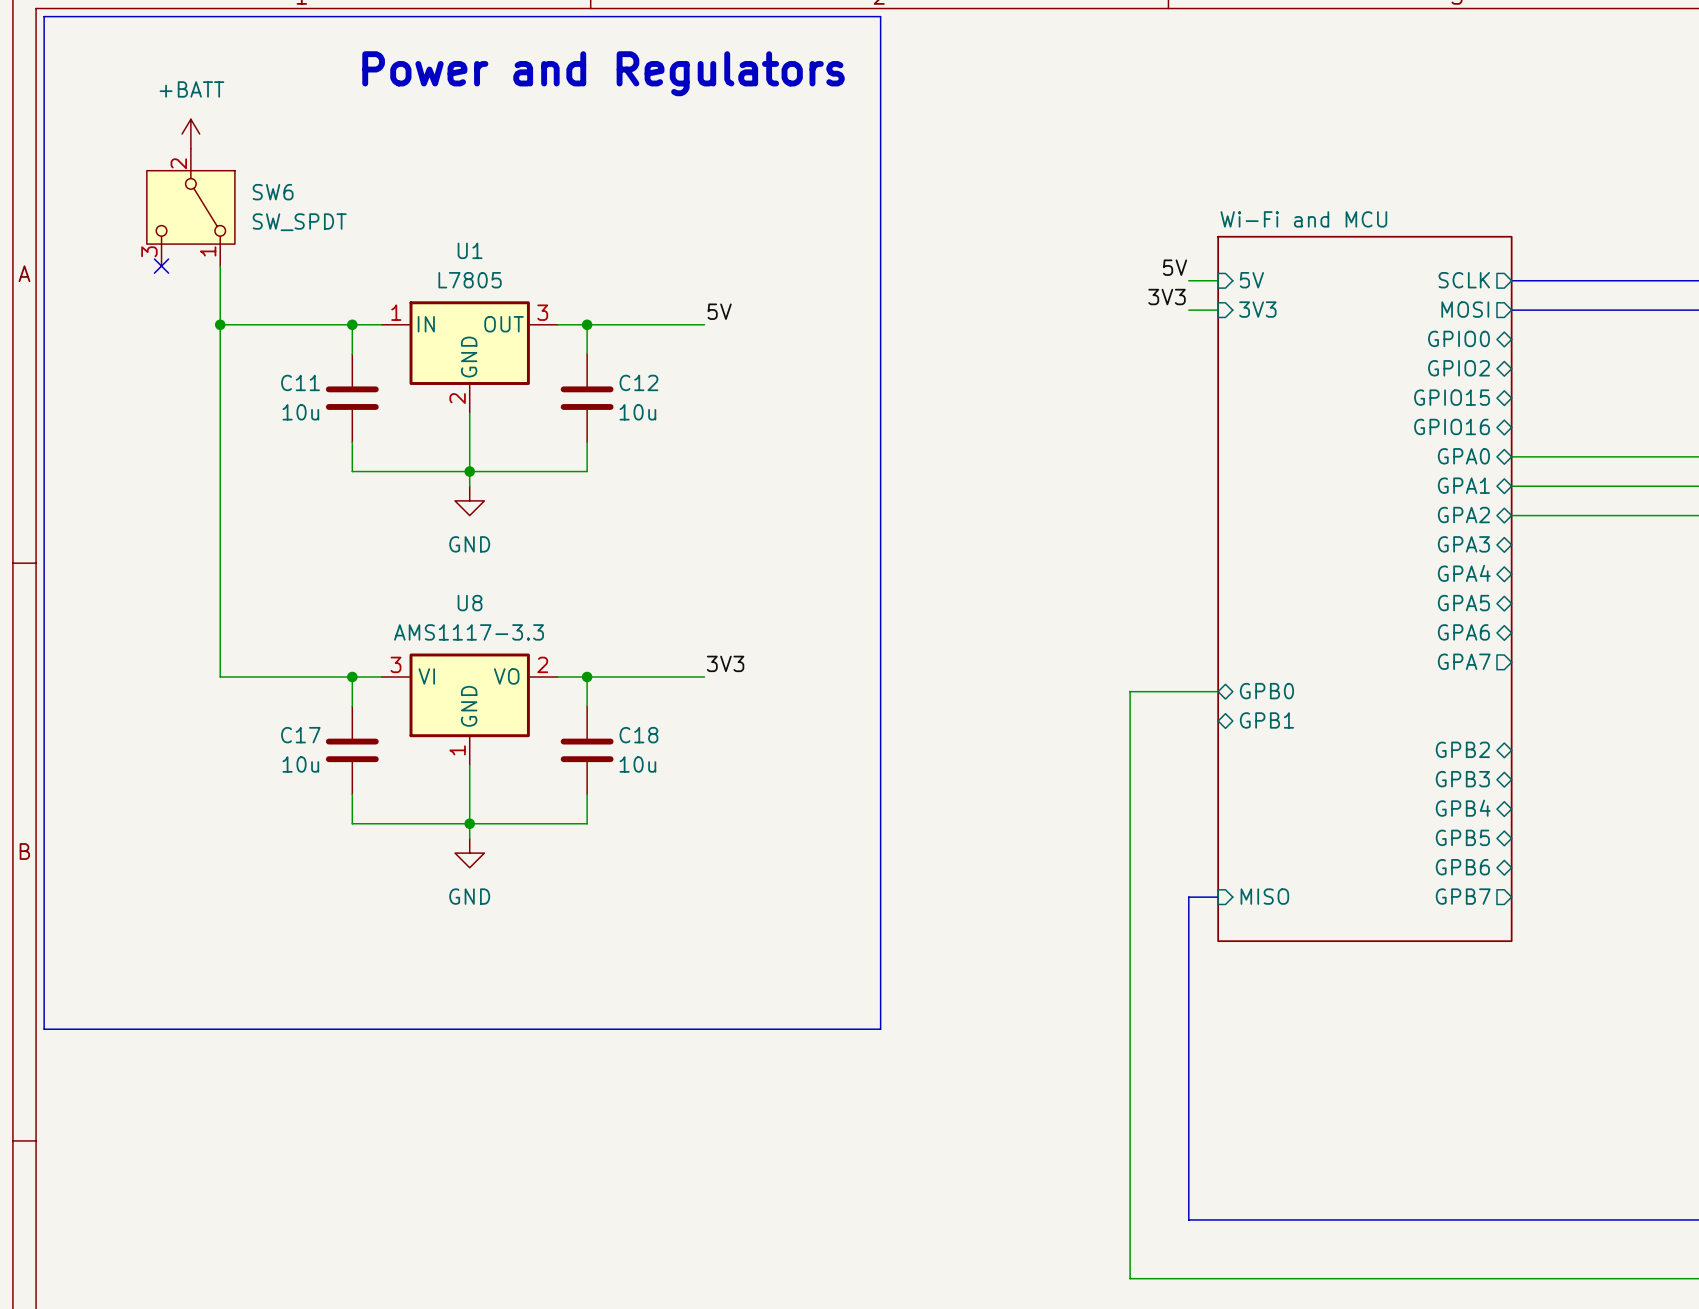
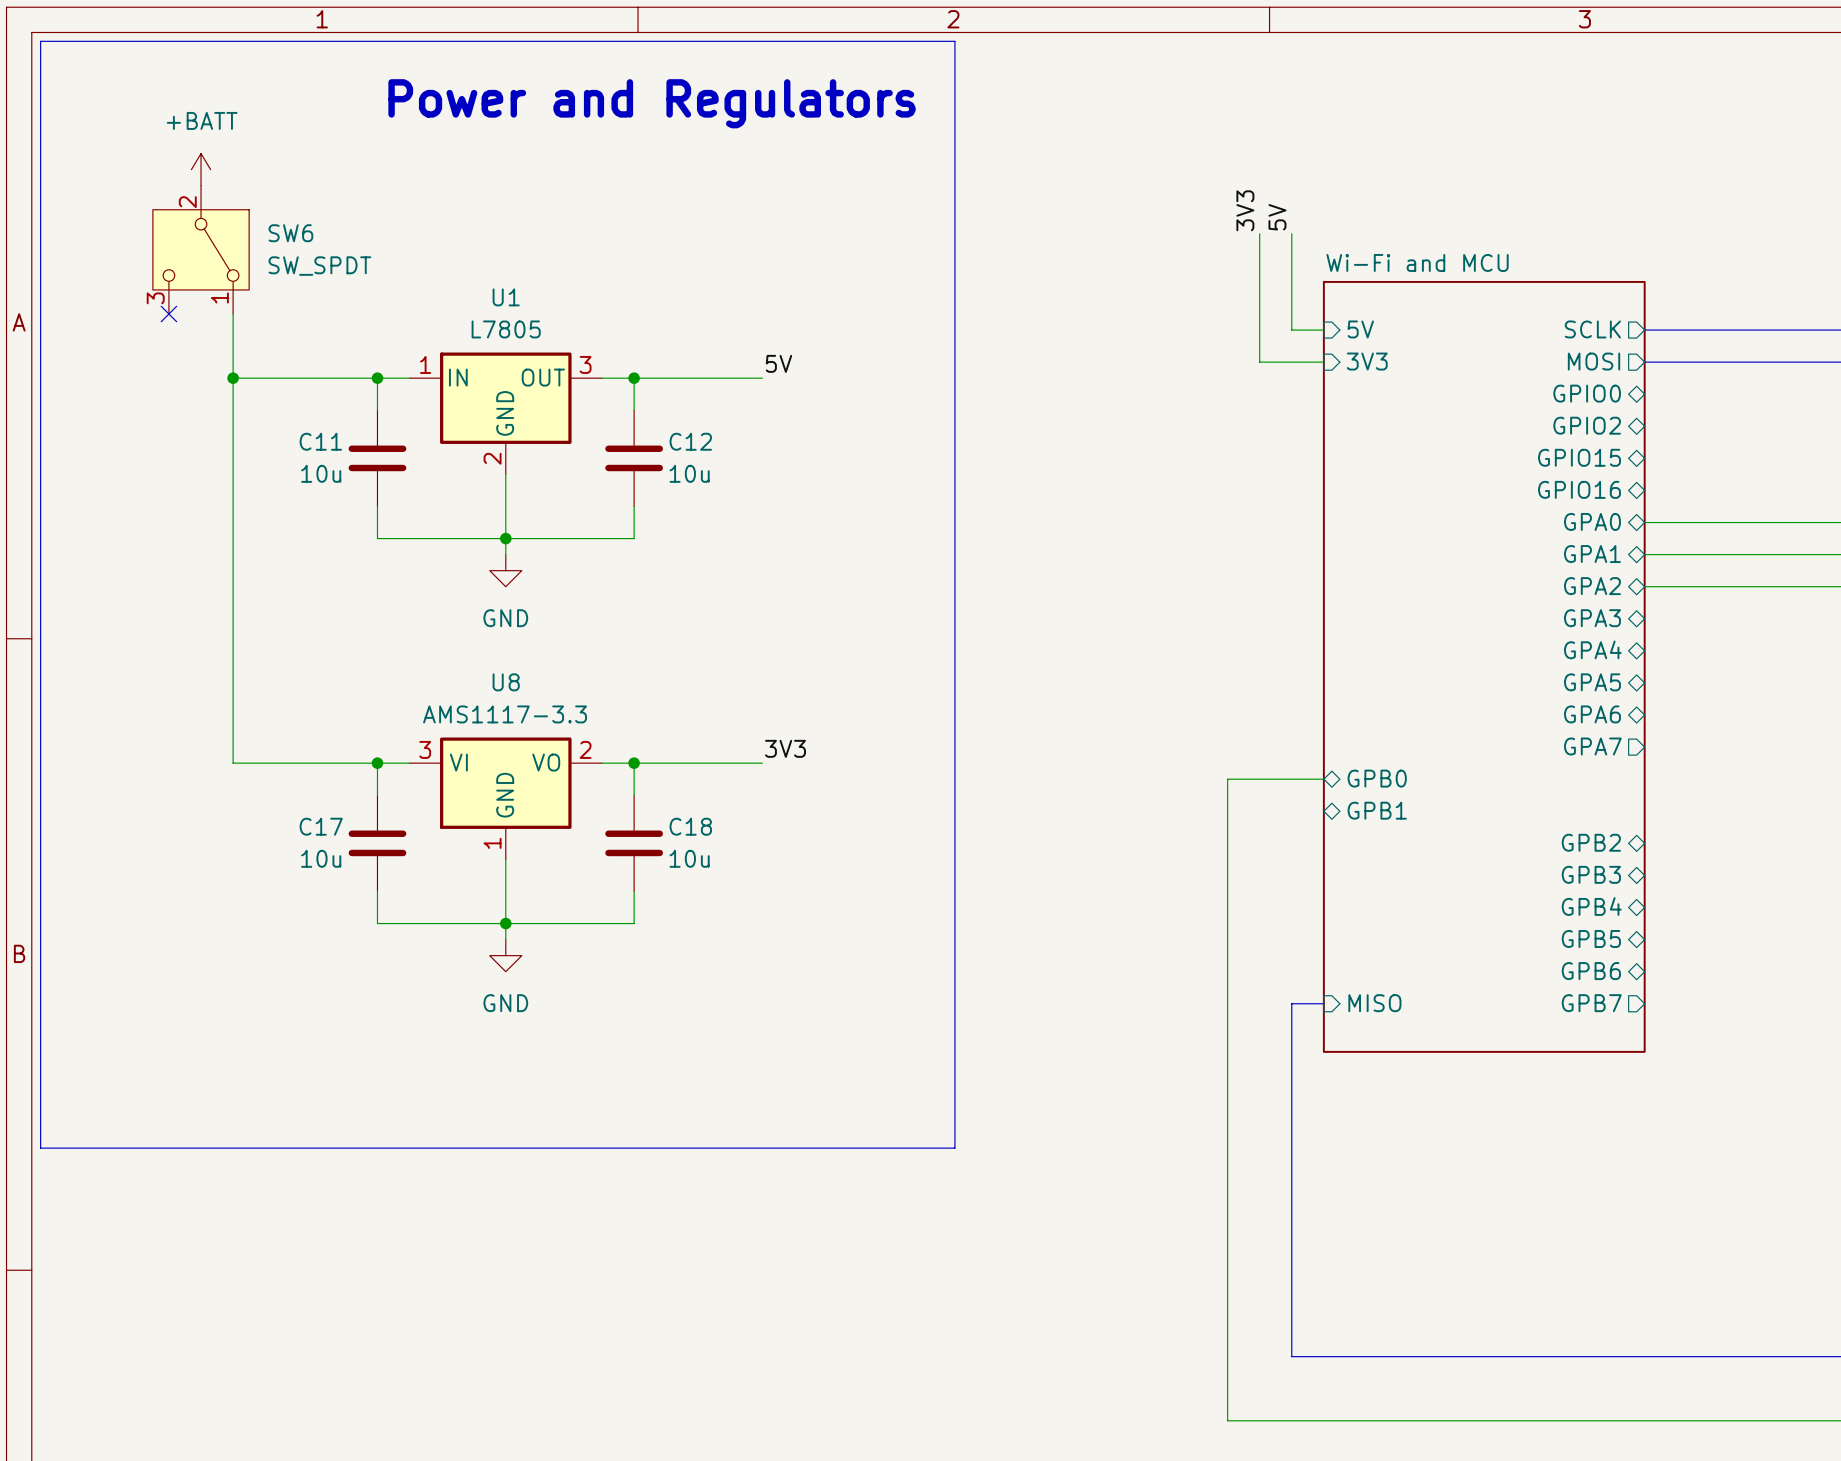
wire: none -> (1259, 233) (1259, 362) (1291, 362)
wire: none -> (1291, 233) (1291, 330)
label rotation: 0° (1175, 267) -> 90° counterclockwise (1277, 217)
label position: 5V (1175, 267) -> 5V (1277, 217)
label rotation: 0° (1167, 297) -> 90° counterclockwise (1245, 210)
label position: 3V3 (1167, 297) -> 3V3 (1245, 210)

